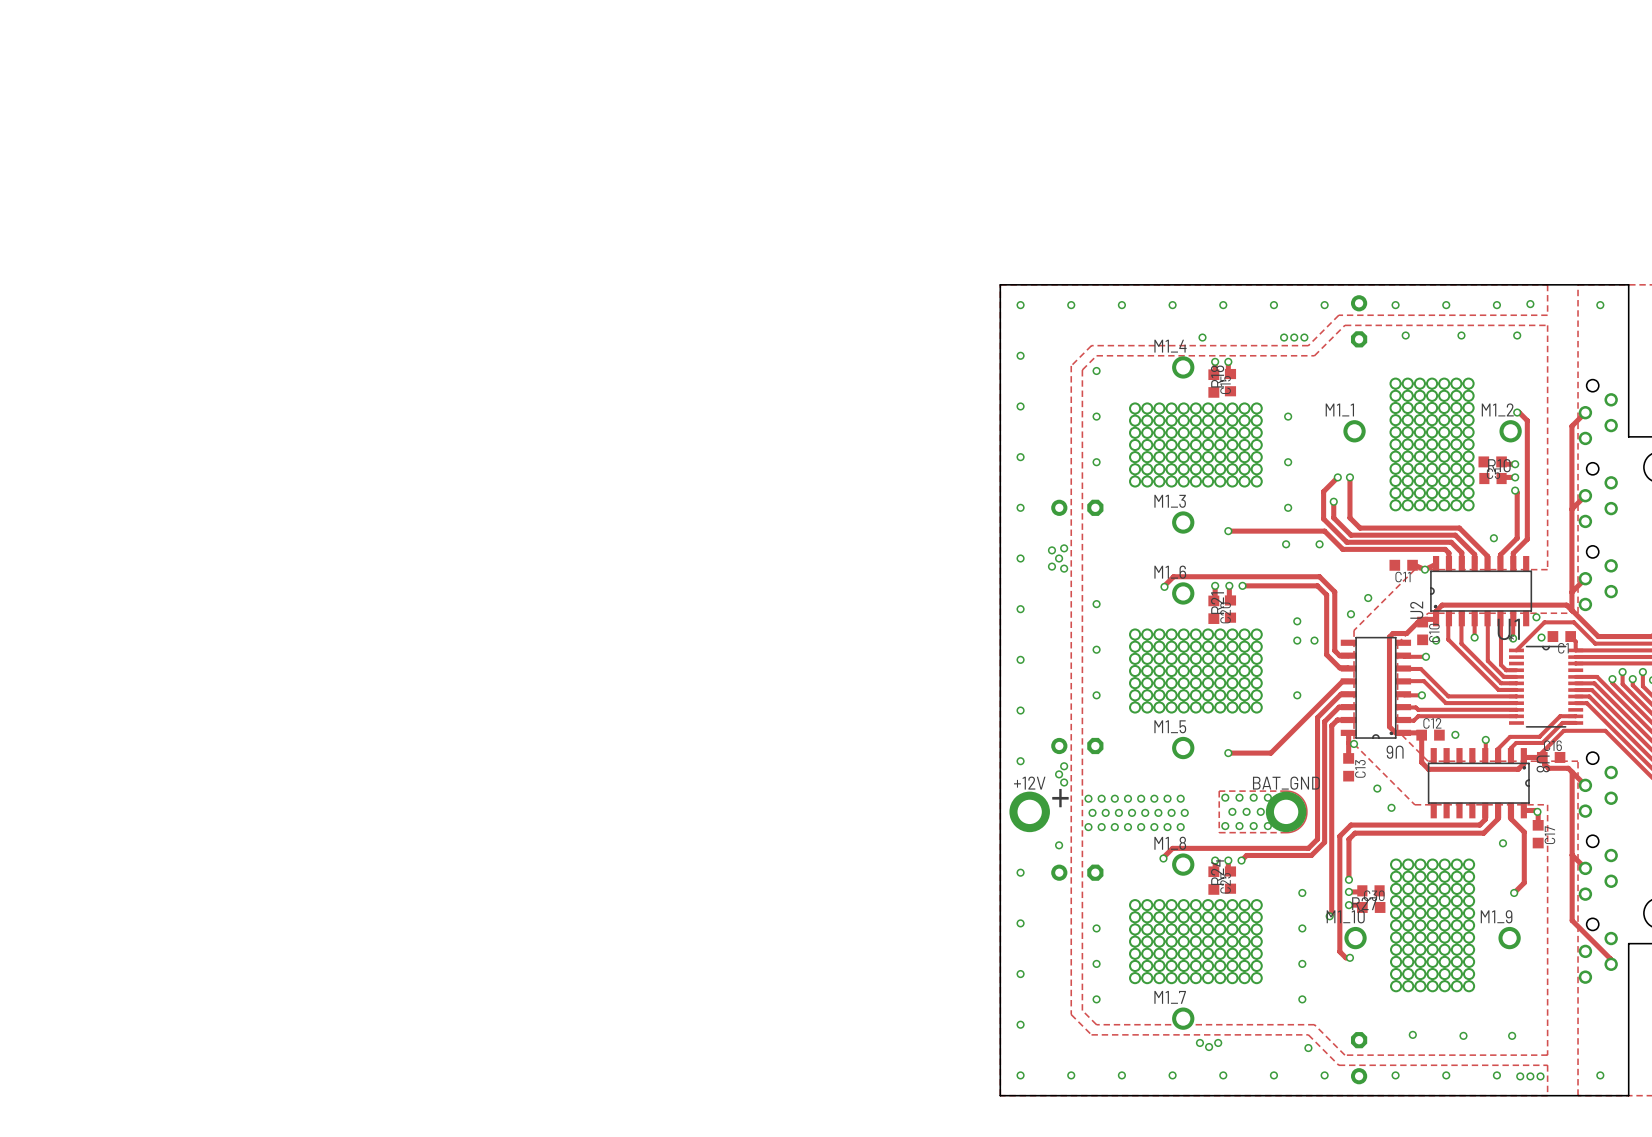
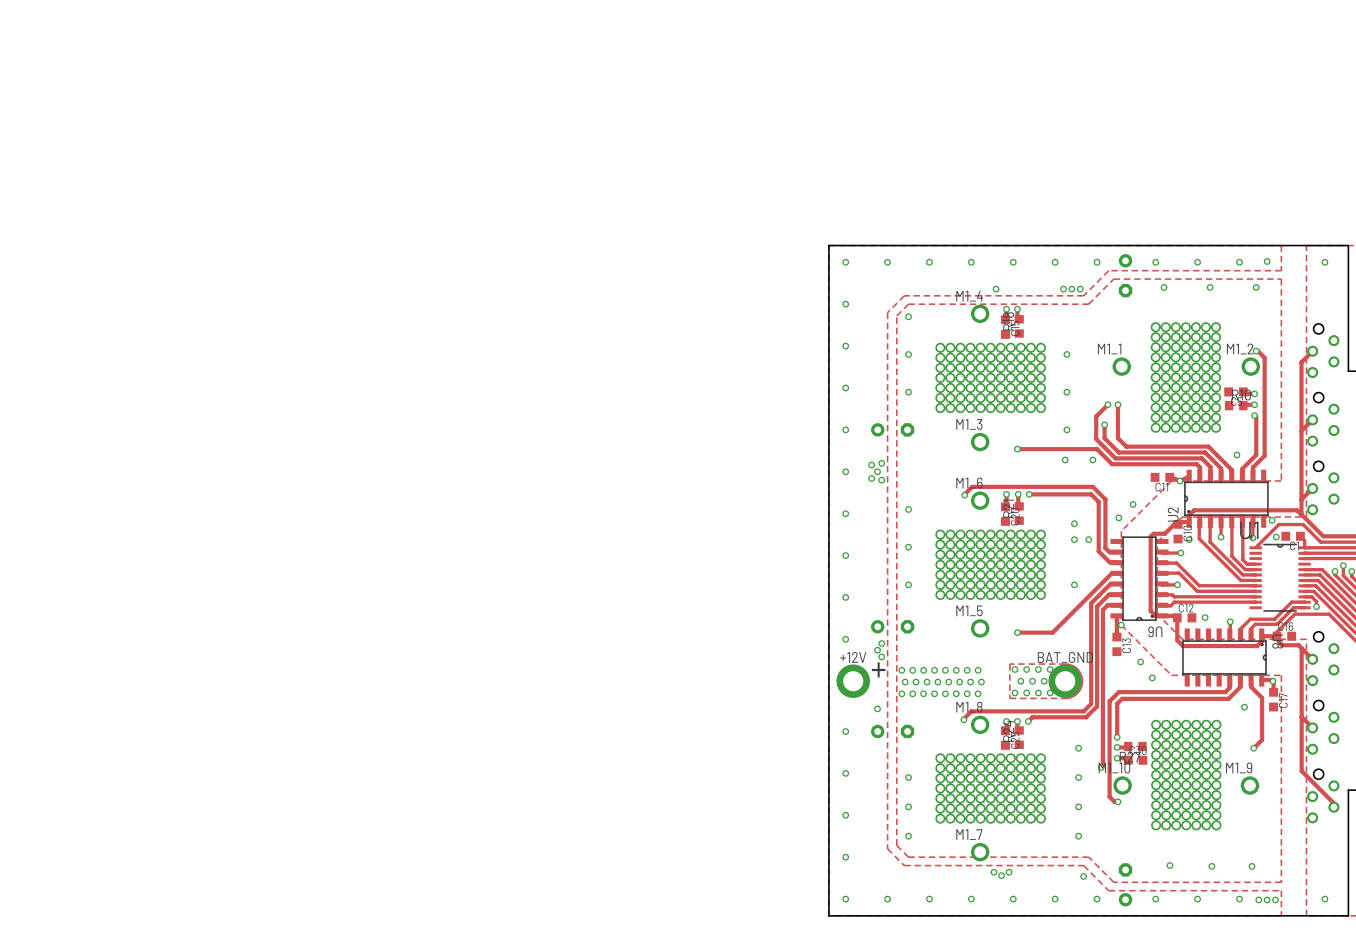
track: none -> (1304, 596) (1311, 596) (1316, 601) (1316, 606)
via: none -> (1316, 606)

